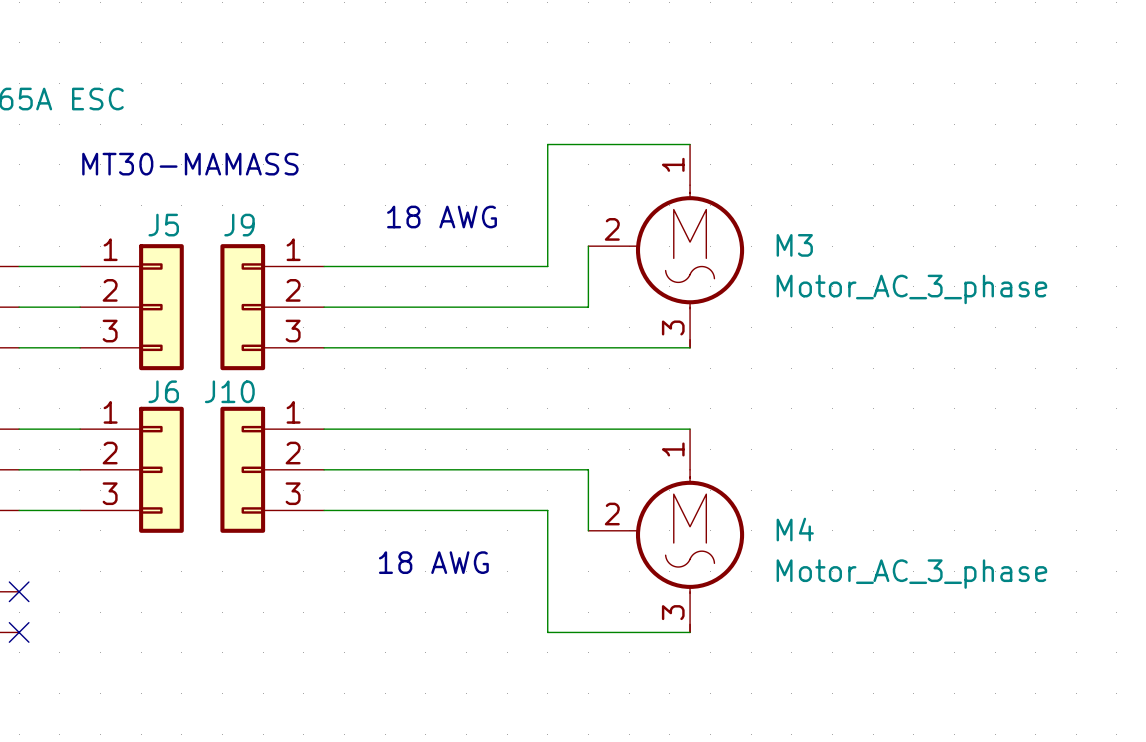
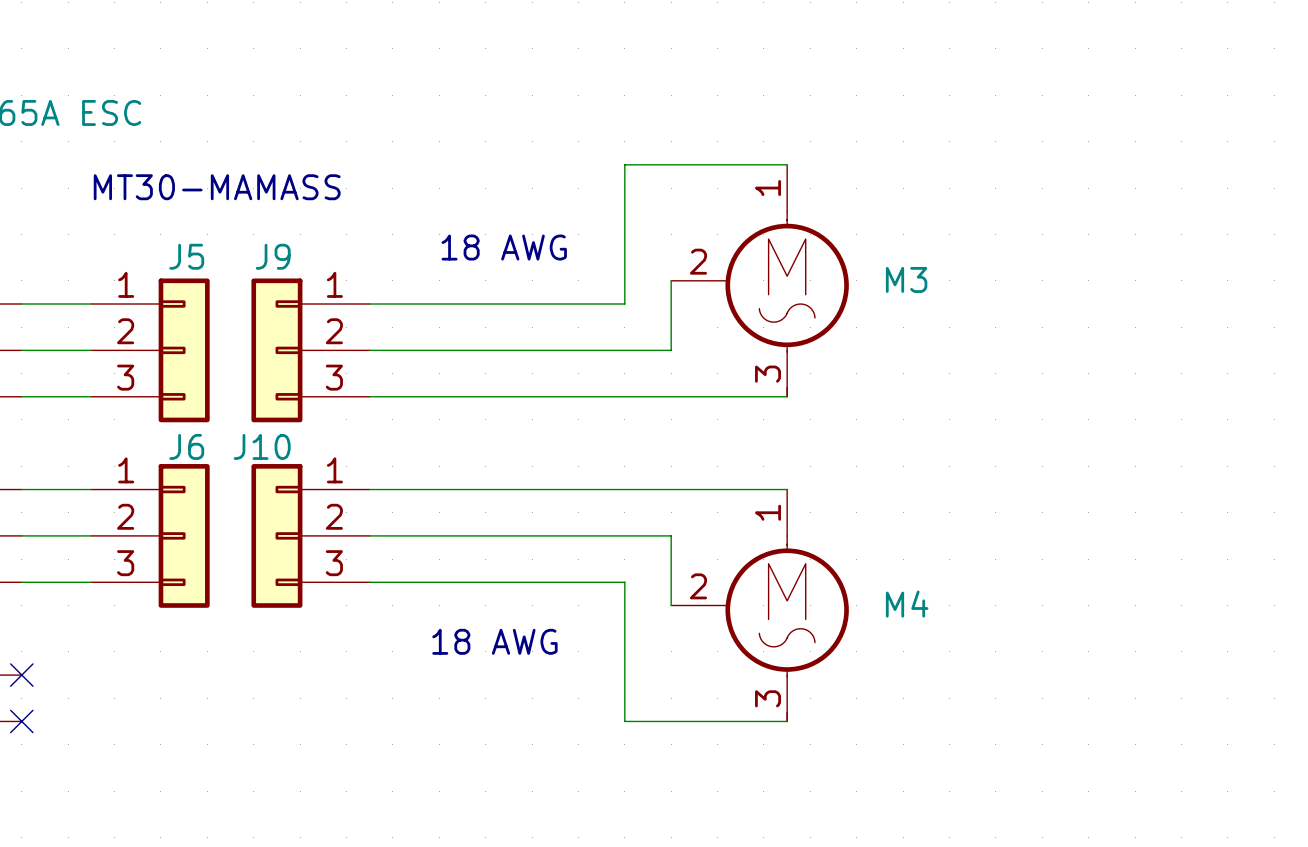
M3 value: Motor_AC_3_phase (911, 289) -> none
M4 value: Motor_AC_3_phase (911, 574) -> none

